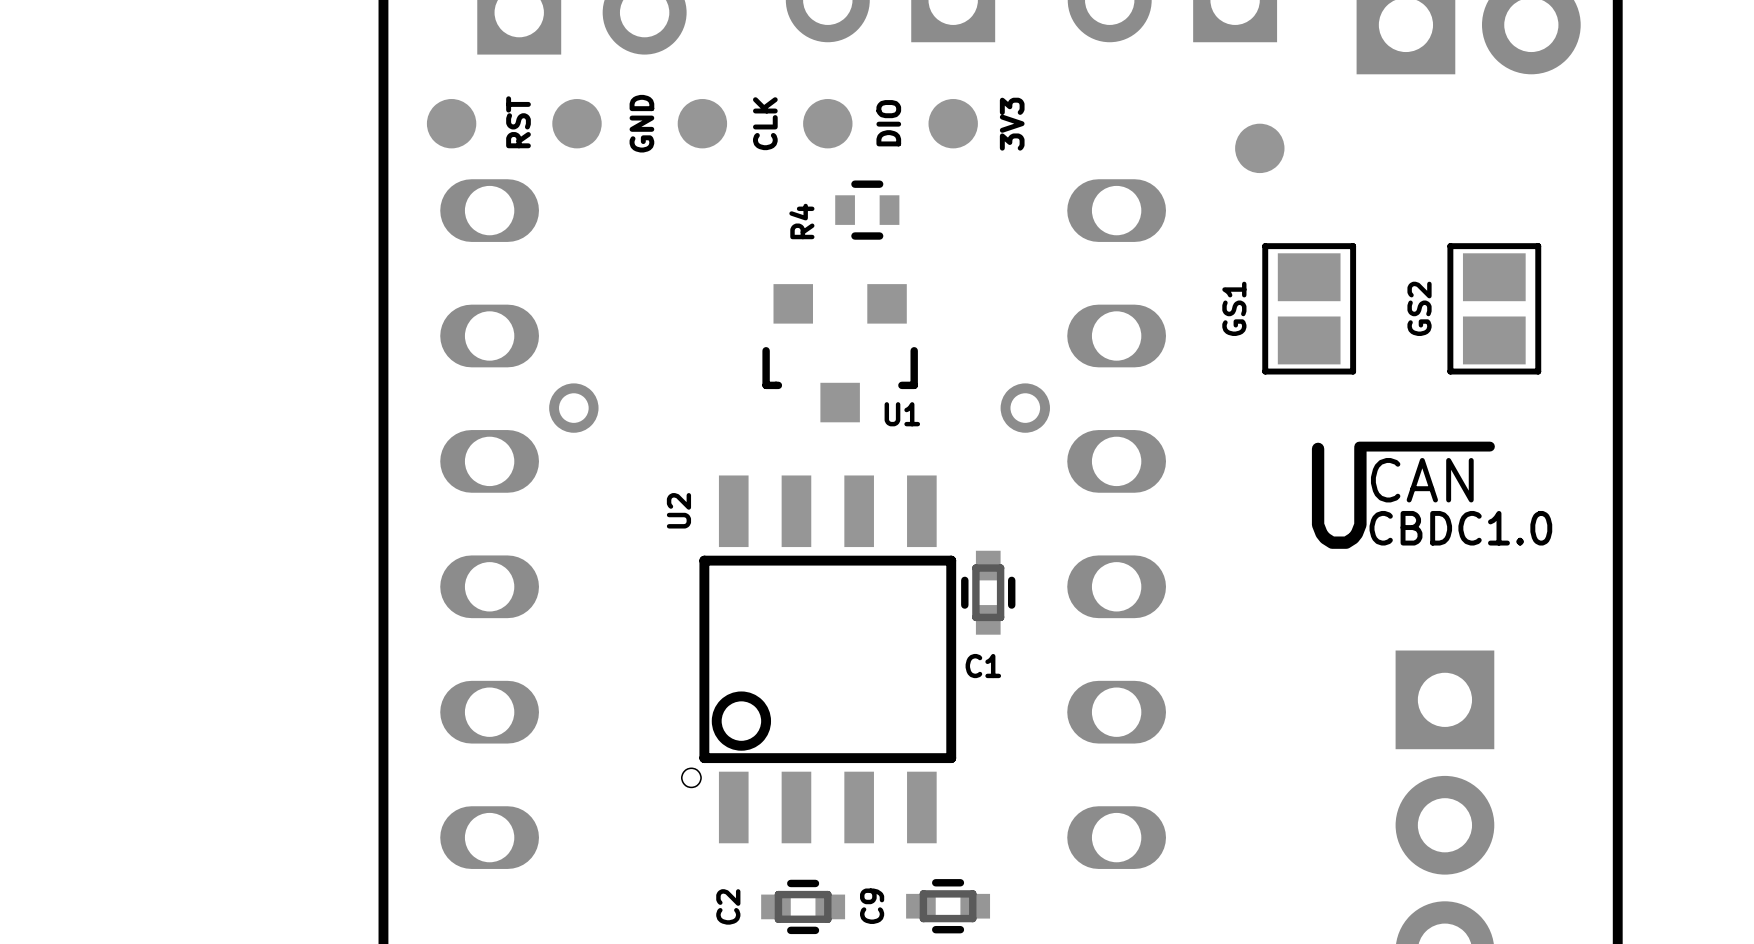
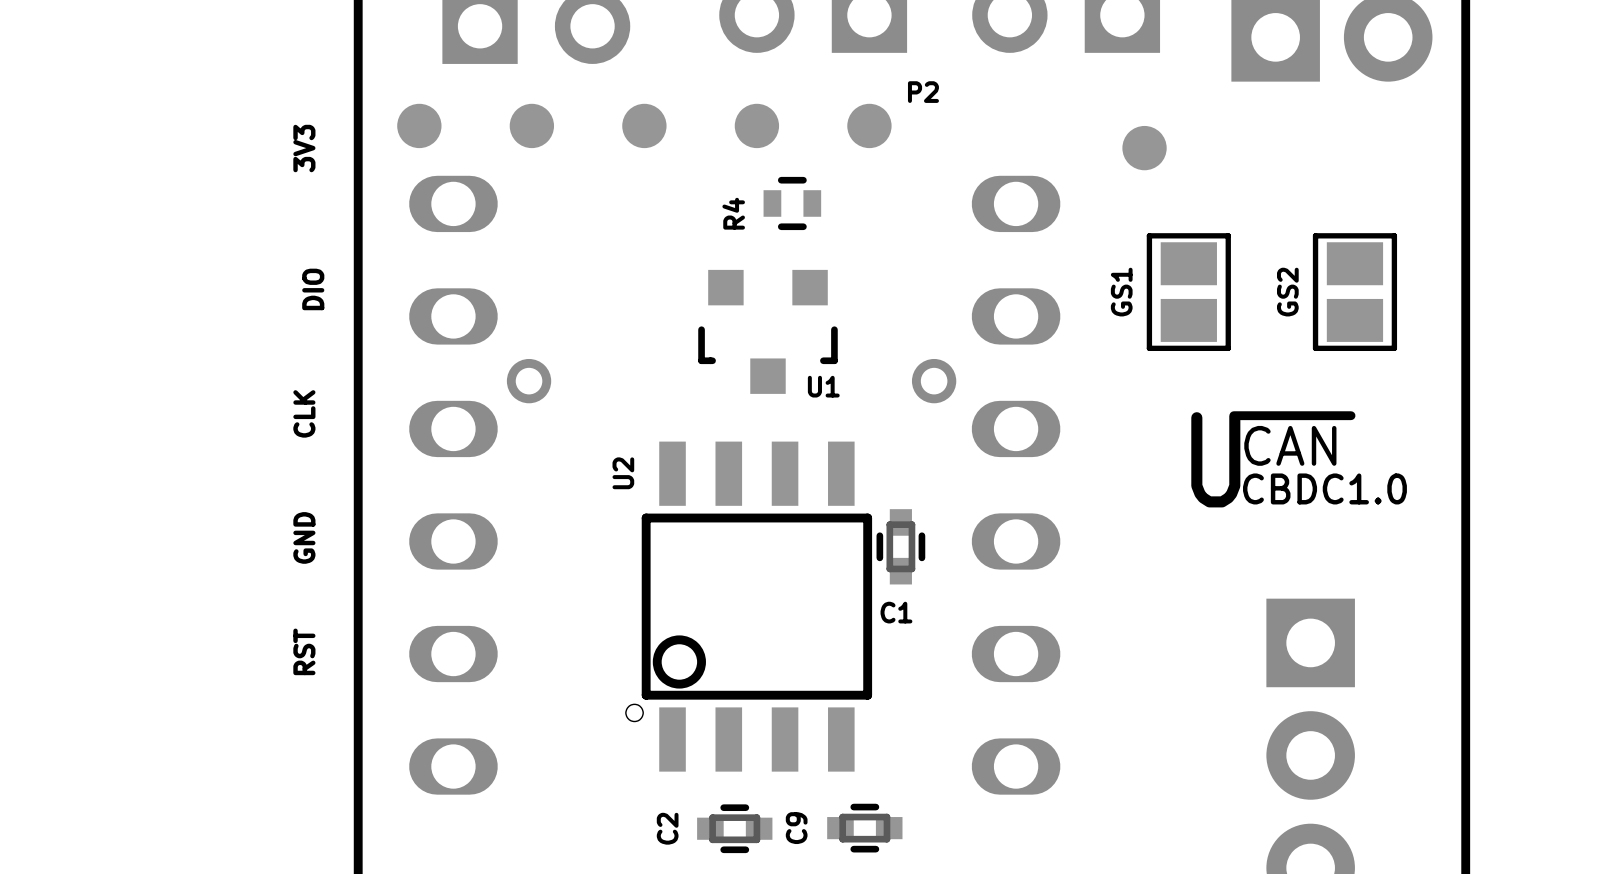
P2 name: none -> P2 (923, 92)
text position: RST (518, 122) -> RST (304, 651)
text position: GND (641, 123) -> GND (304, 537)
text position: CLK (765, 123) -> CLK (304, 413)
text position: DIO (888, 123) -> DIO (313, 289)
text position: 3V3 (1012, 124) -> 3V3 (304, 148)

